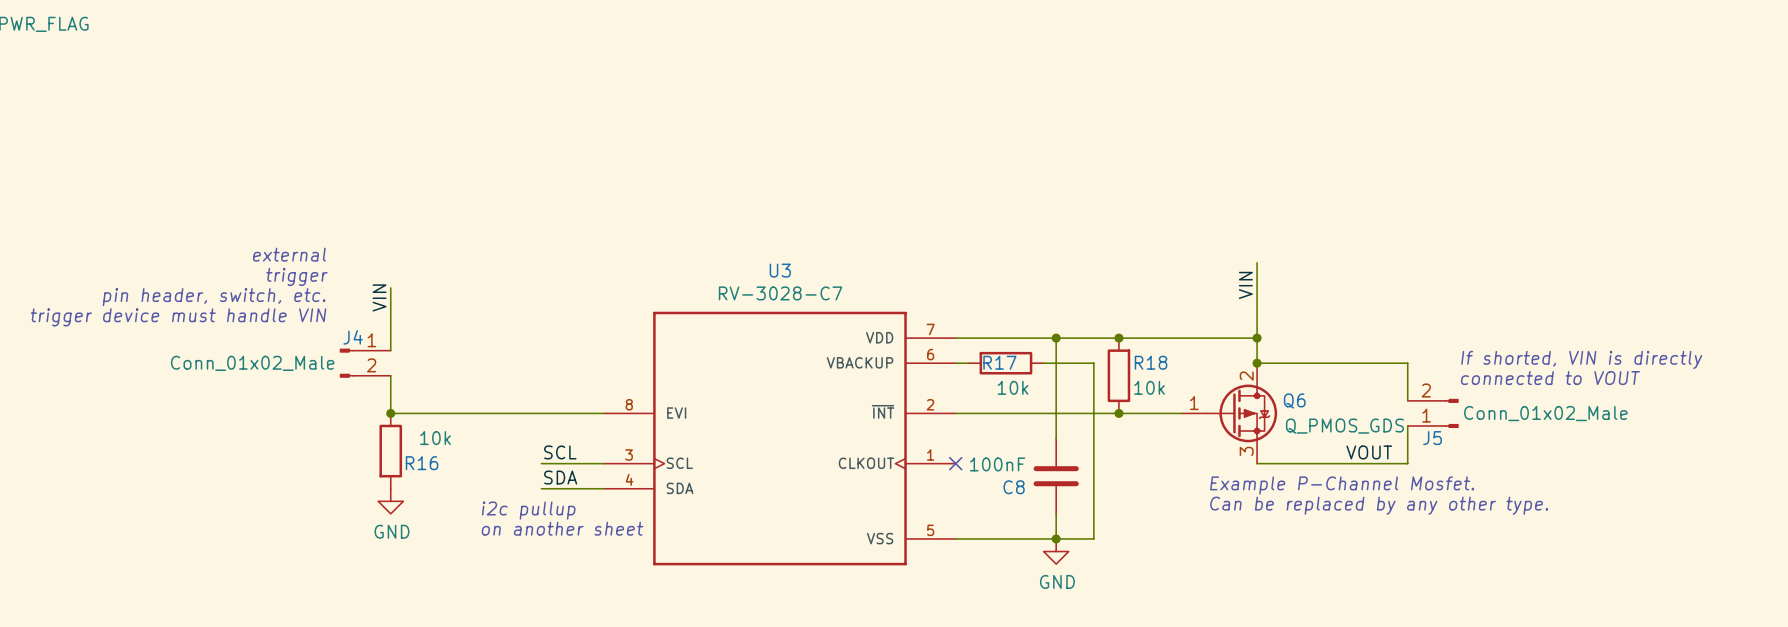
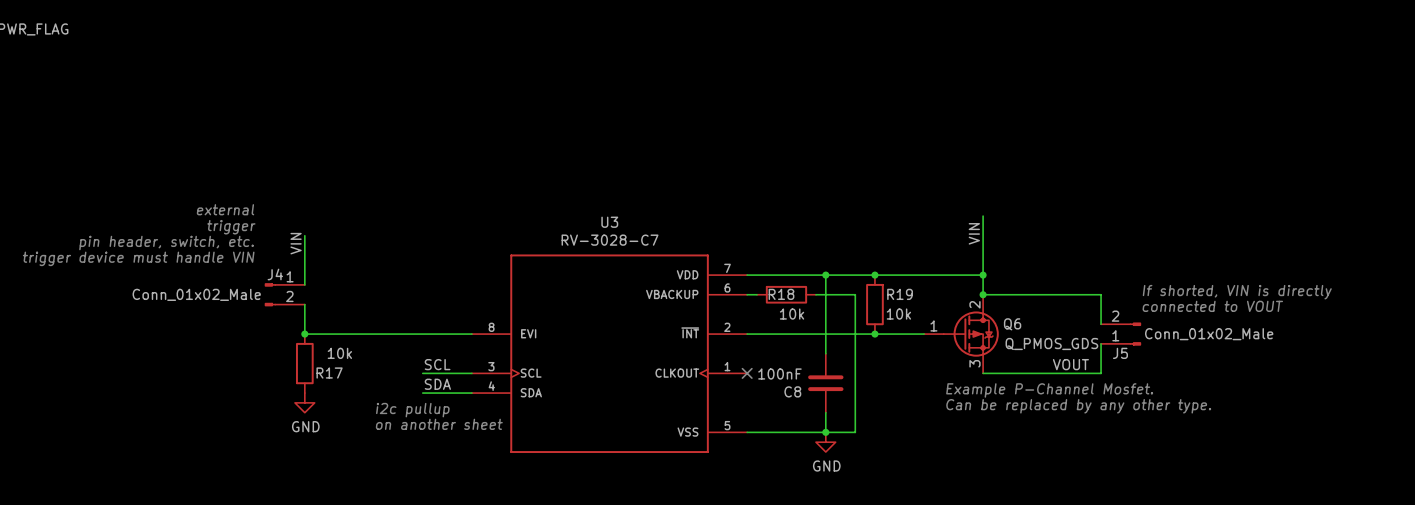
R17 name: R17 (999, 362) -> R18 (781, 294)
R18 name: R18 (1151, 362) -> R19 (900, 294)
R16 name: R16 (422, 463) -> R17 (329, 373)

